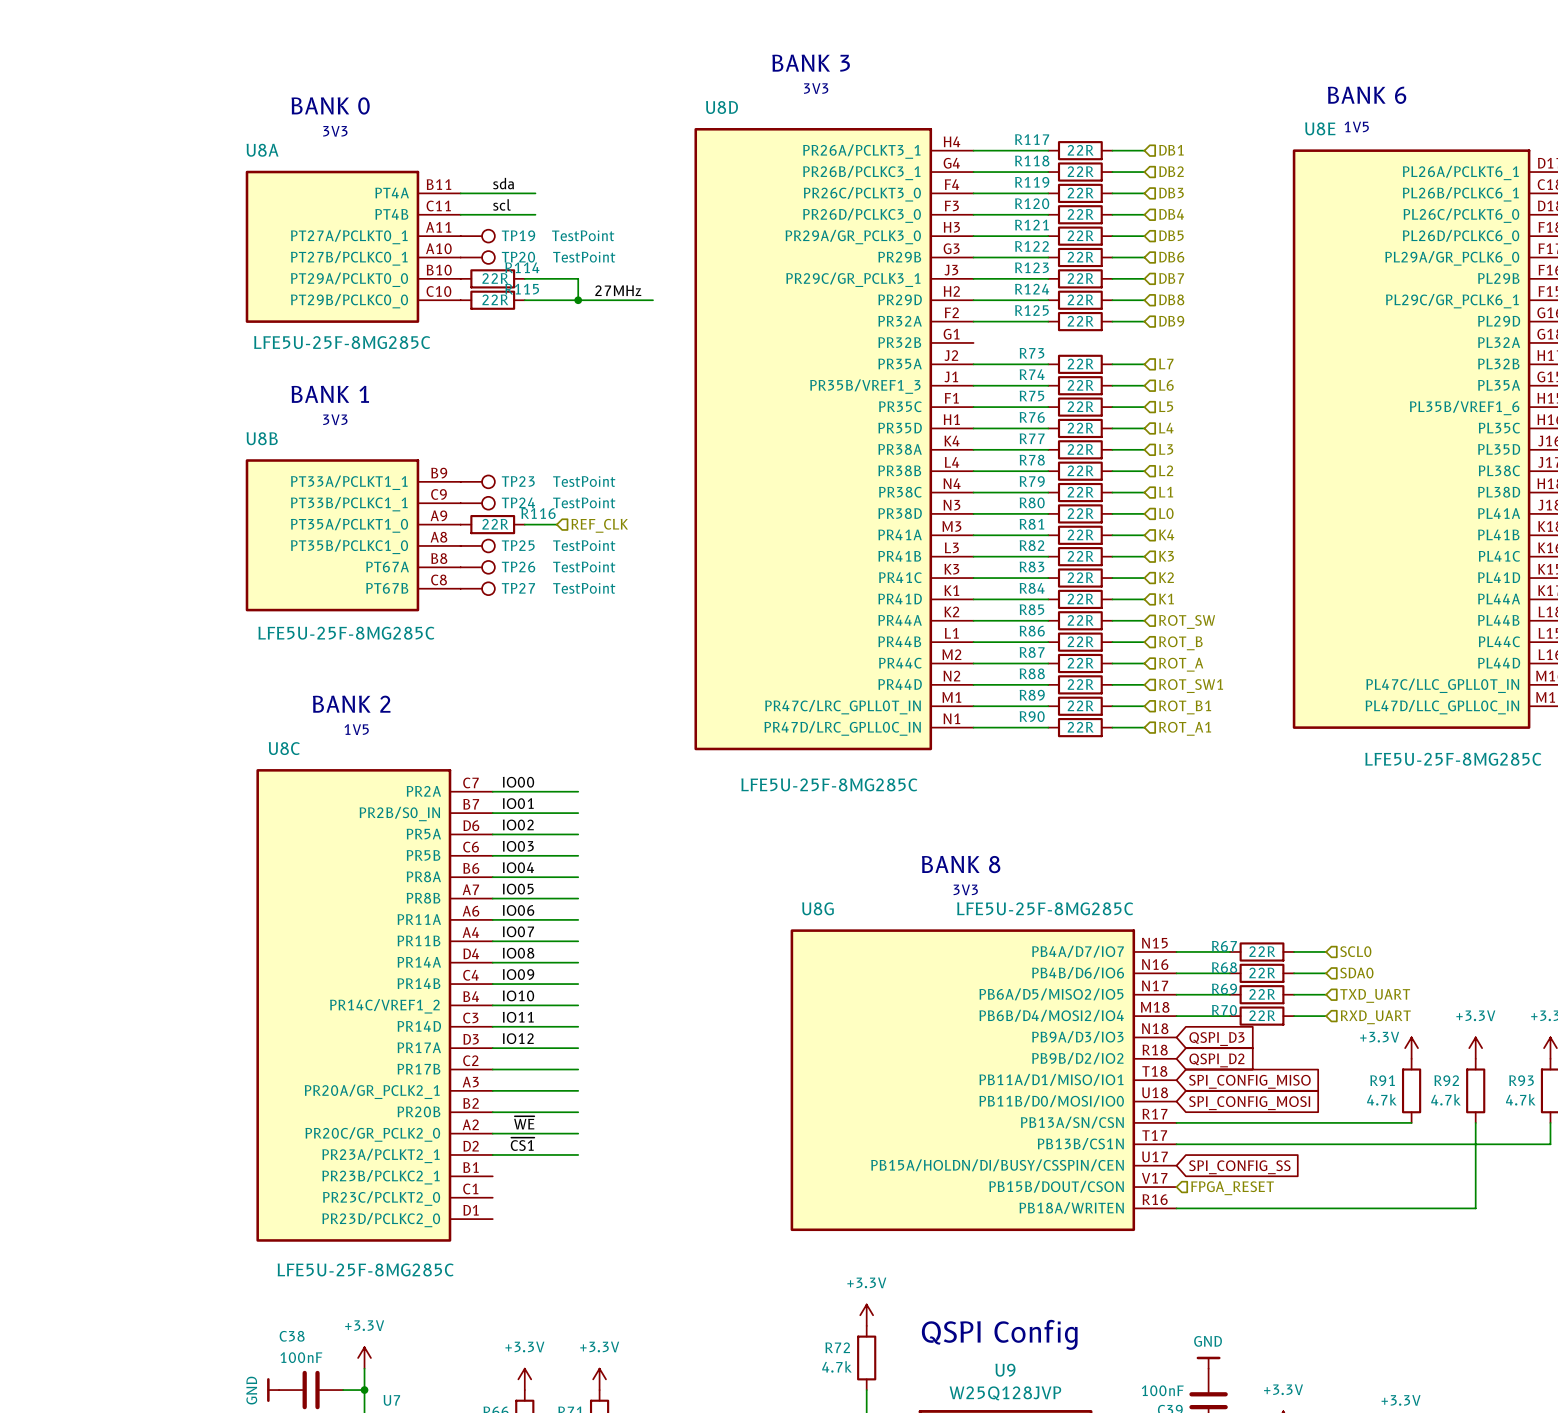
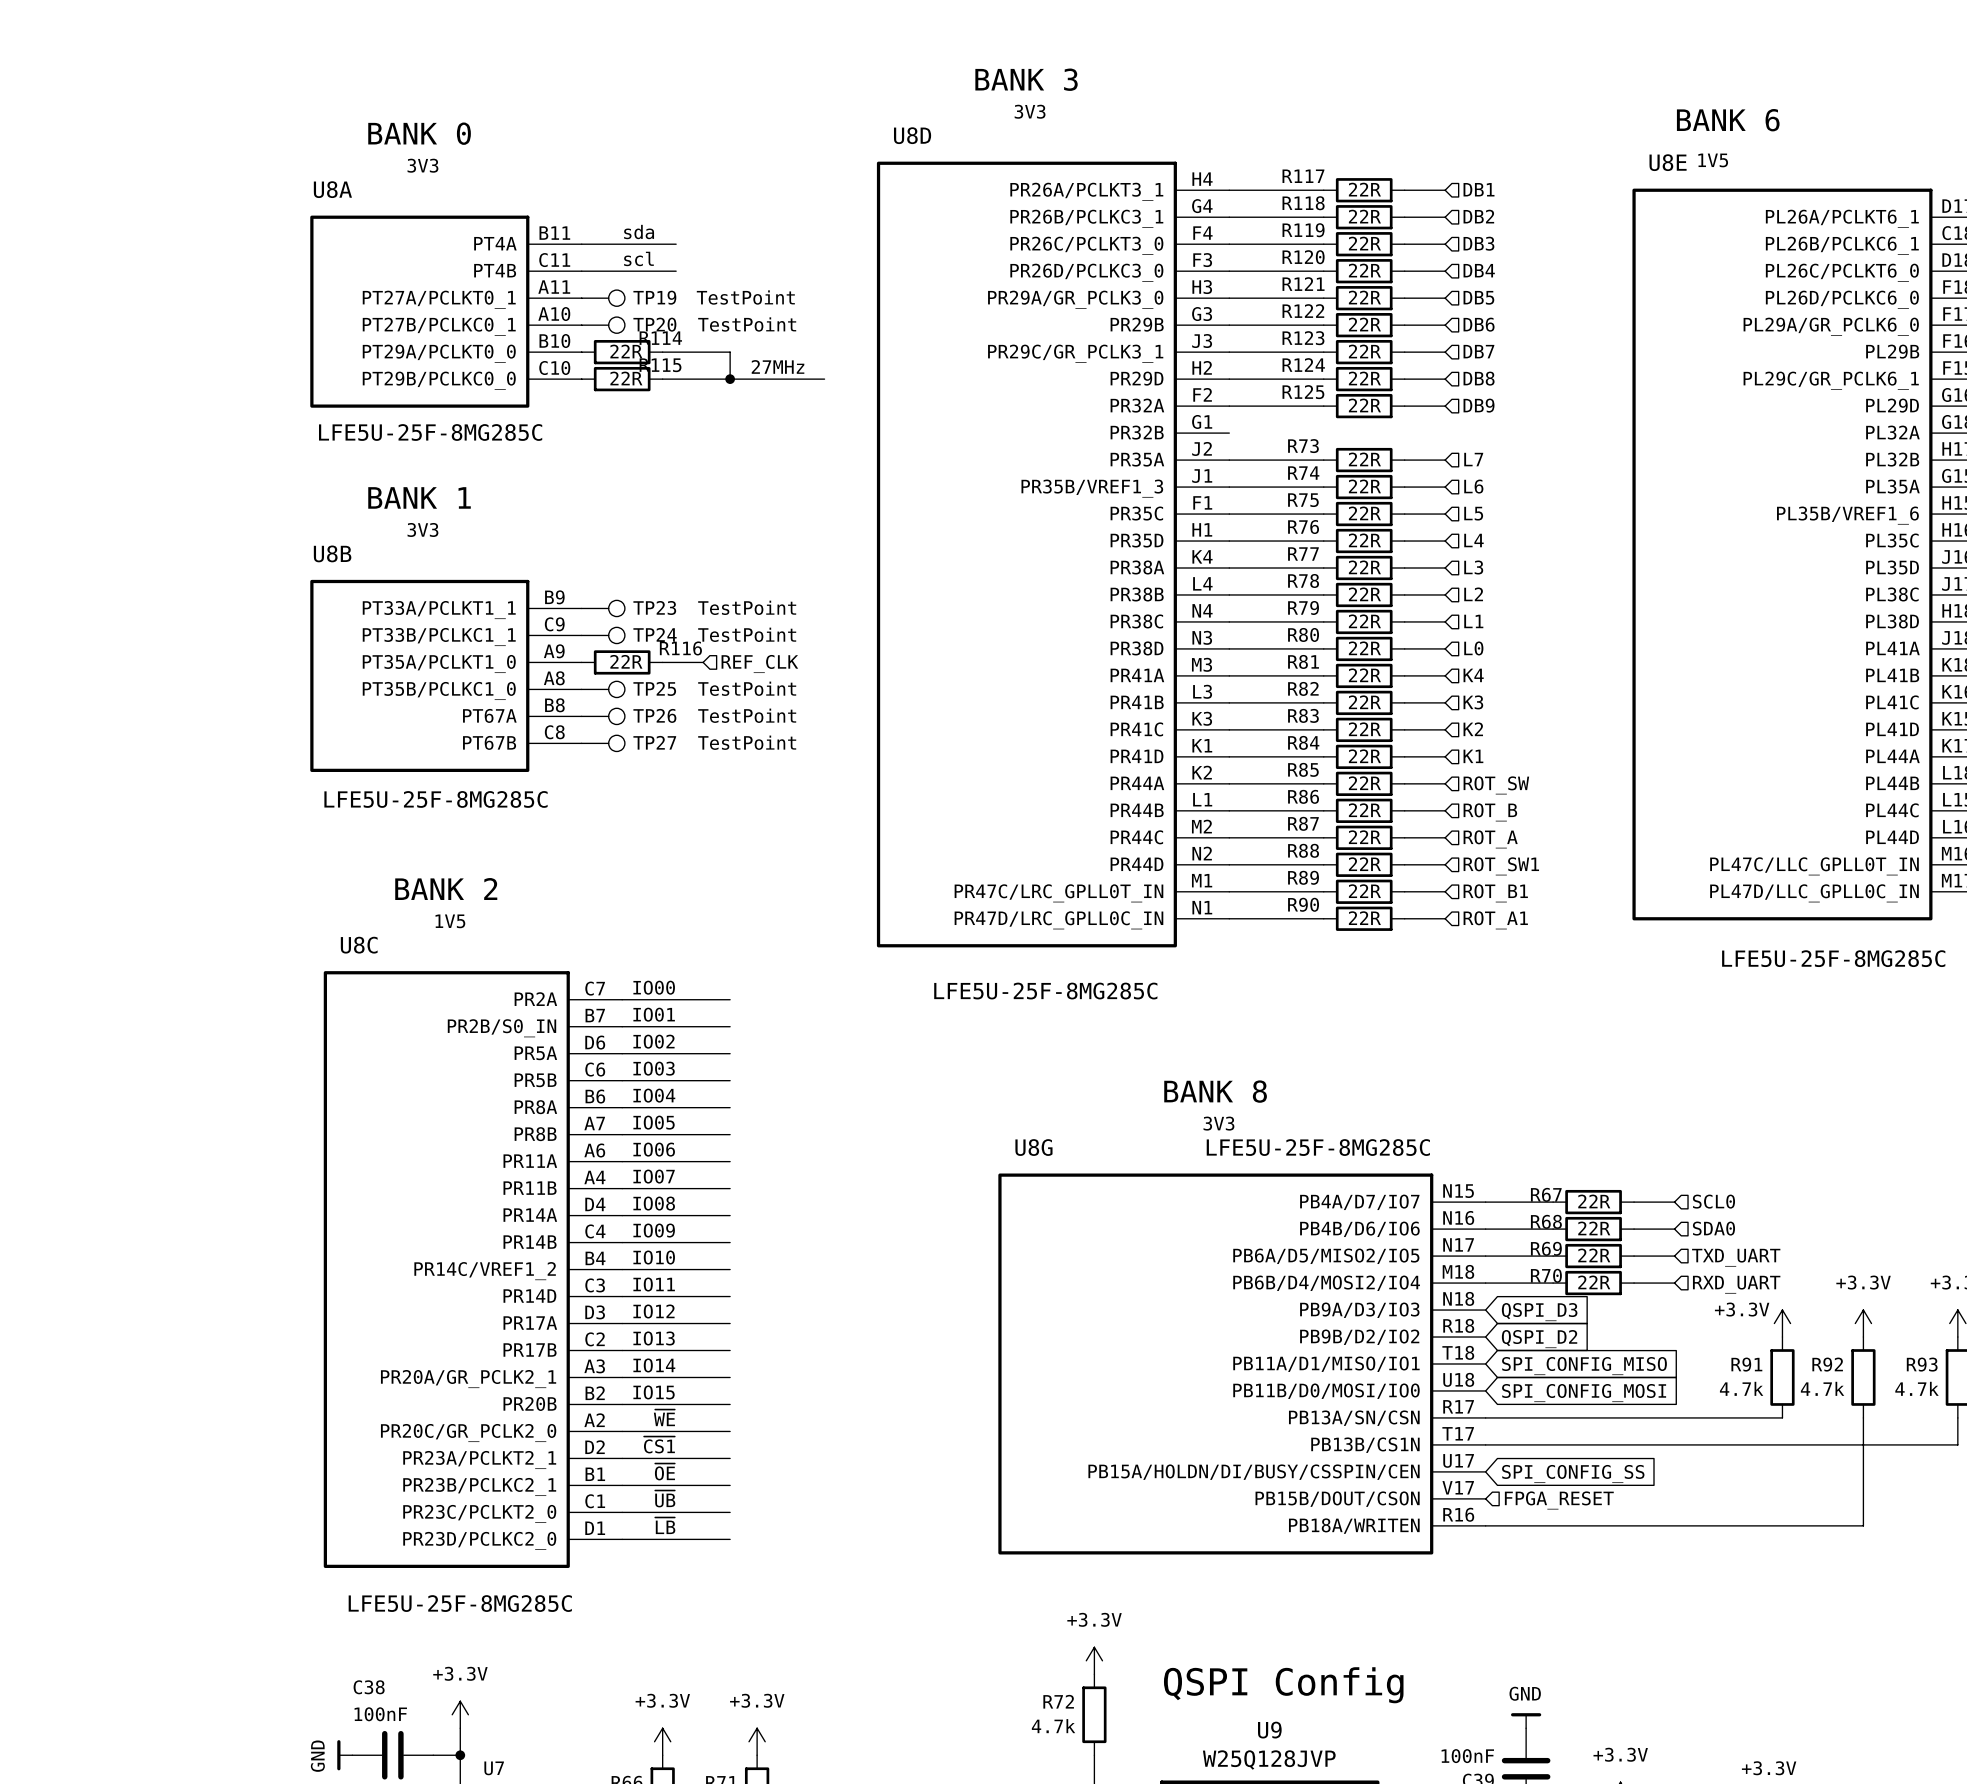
label: none -> IO13 (654, 1338)
label: none -> IO14 (654, 1365)
label: none -> IO15 (654, 1392)
label: none -> ~{OE} (664, 1471)
wire: none -> (622, 1485) (730, 1485)
label: none -> ~{UB} (665, 1498)
wire: none -> (622, 1512) (730, 1512)
label: none -> ~{LB} (665, 1525)
wire: none -> (622, 1539) (730, 1539)

